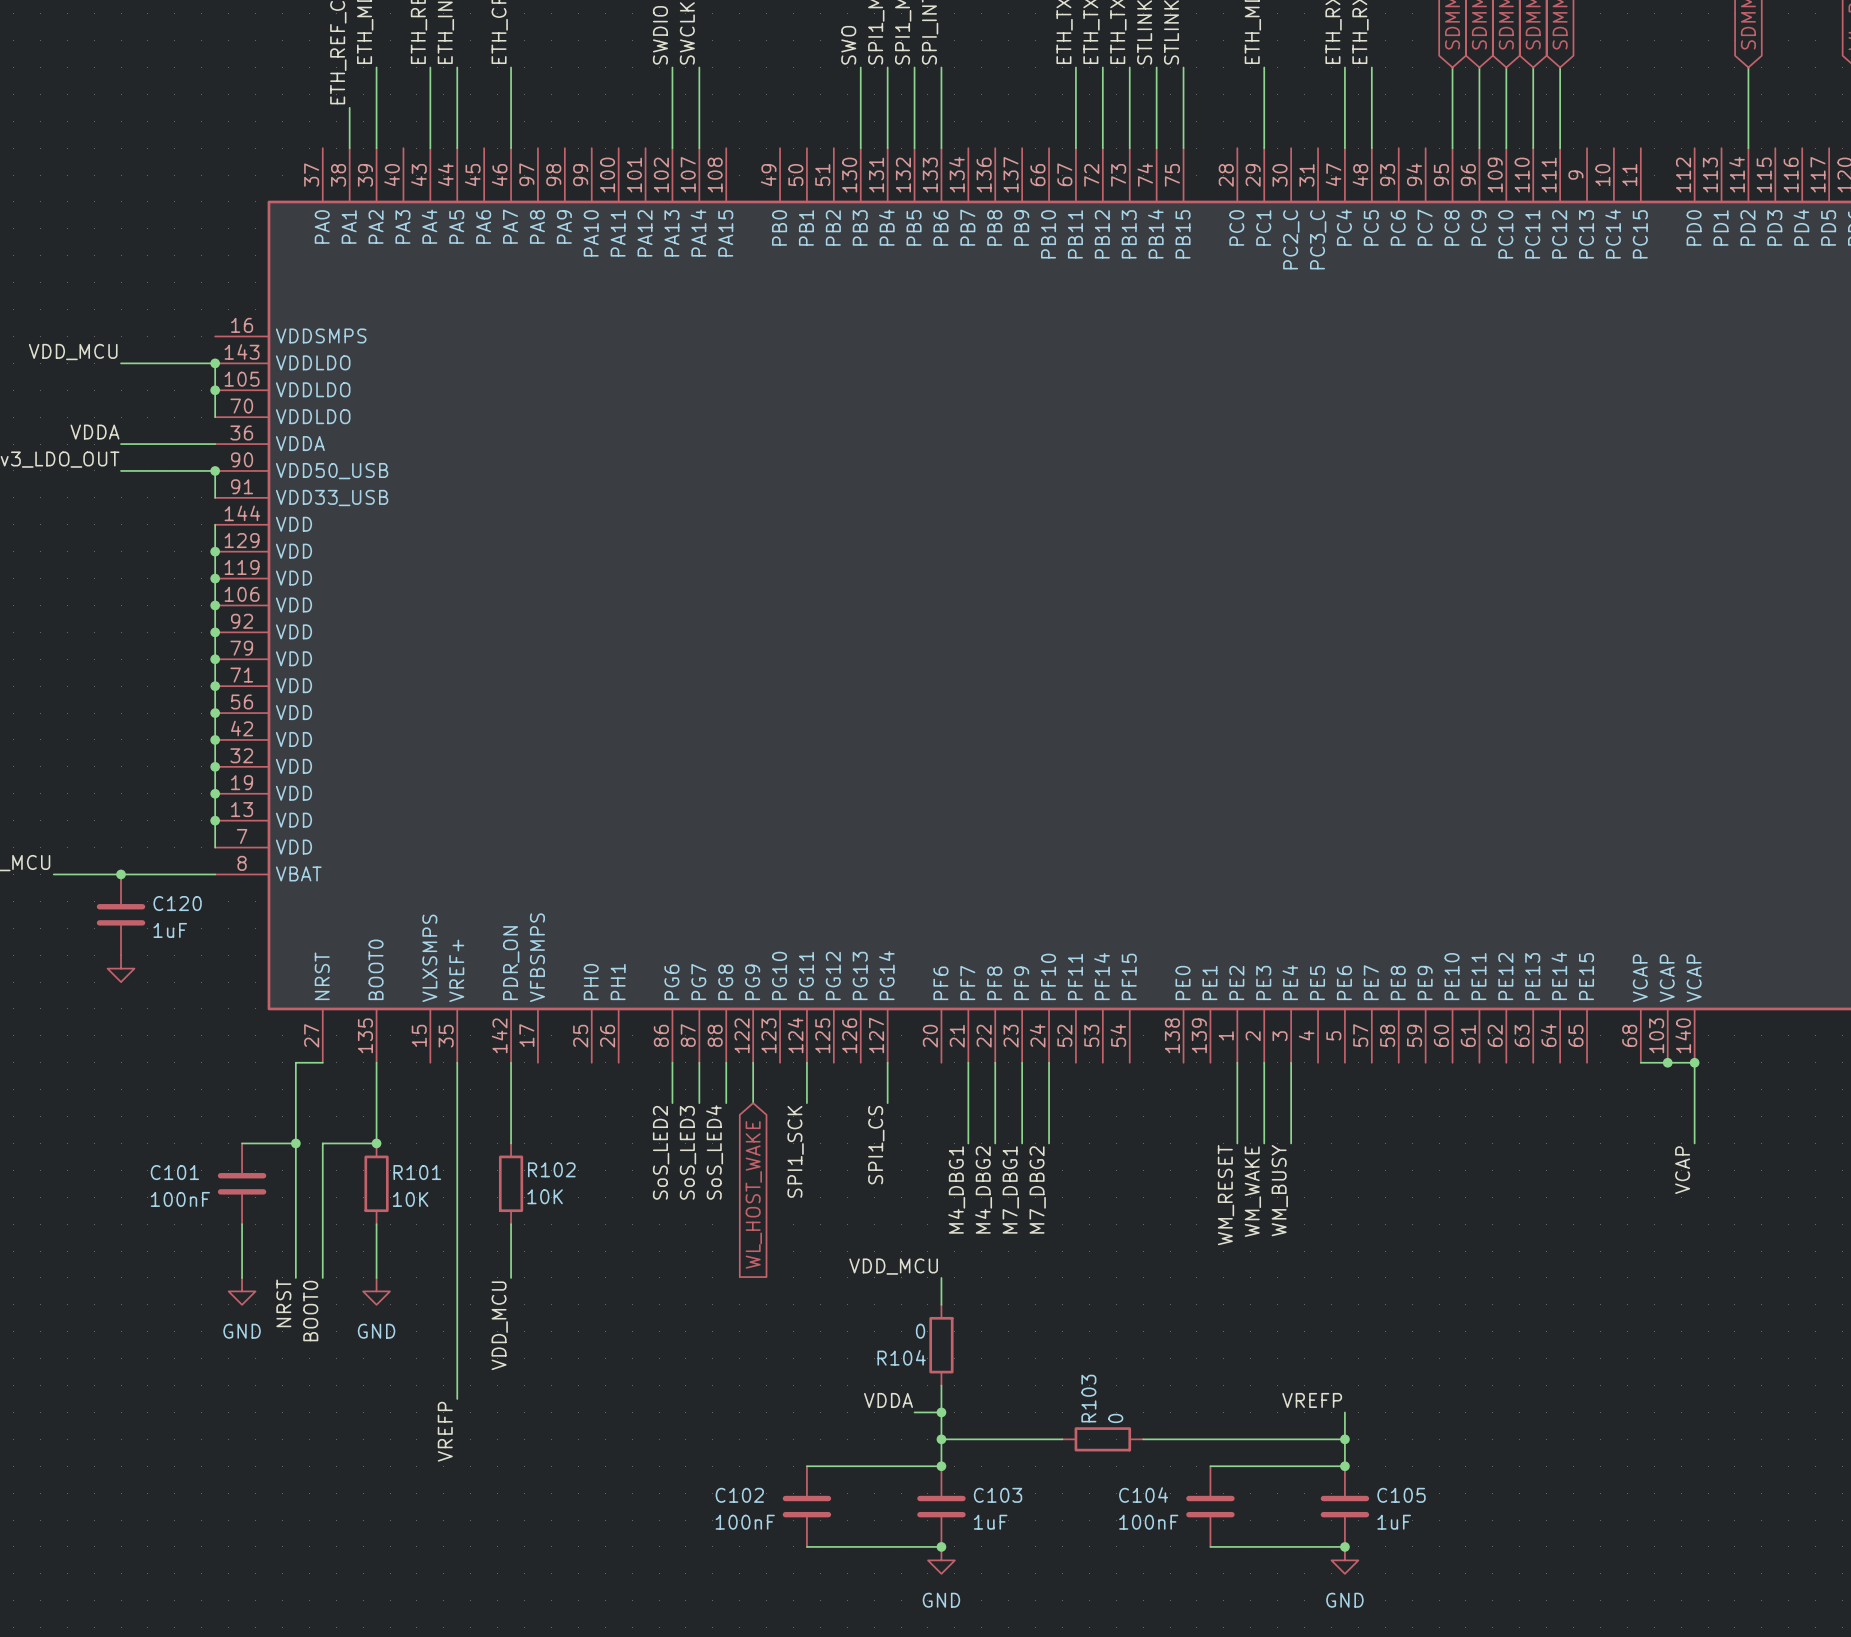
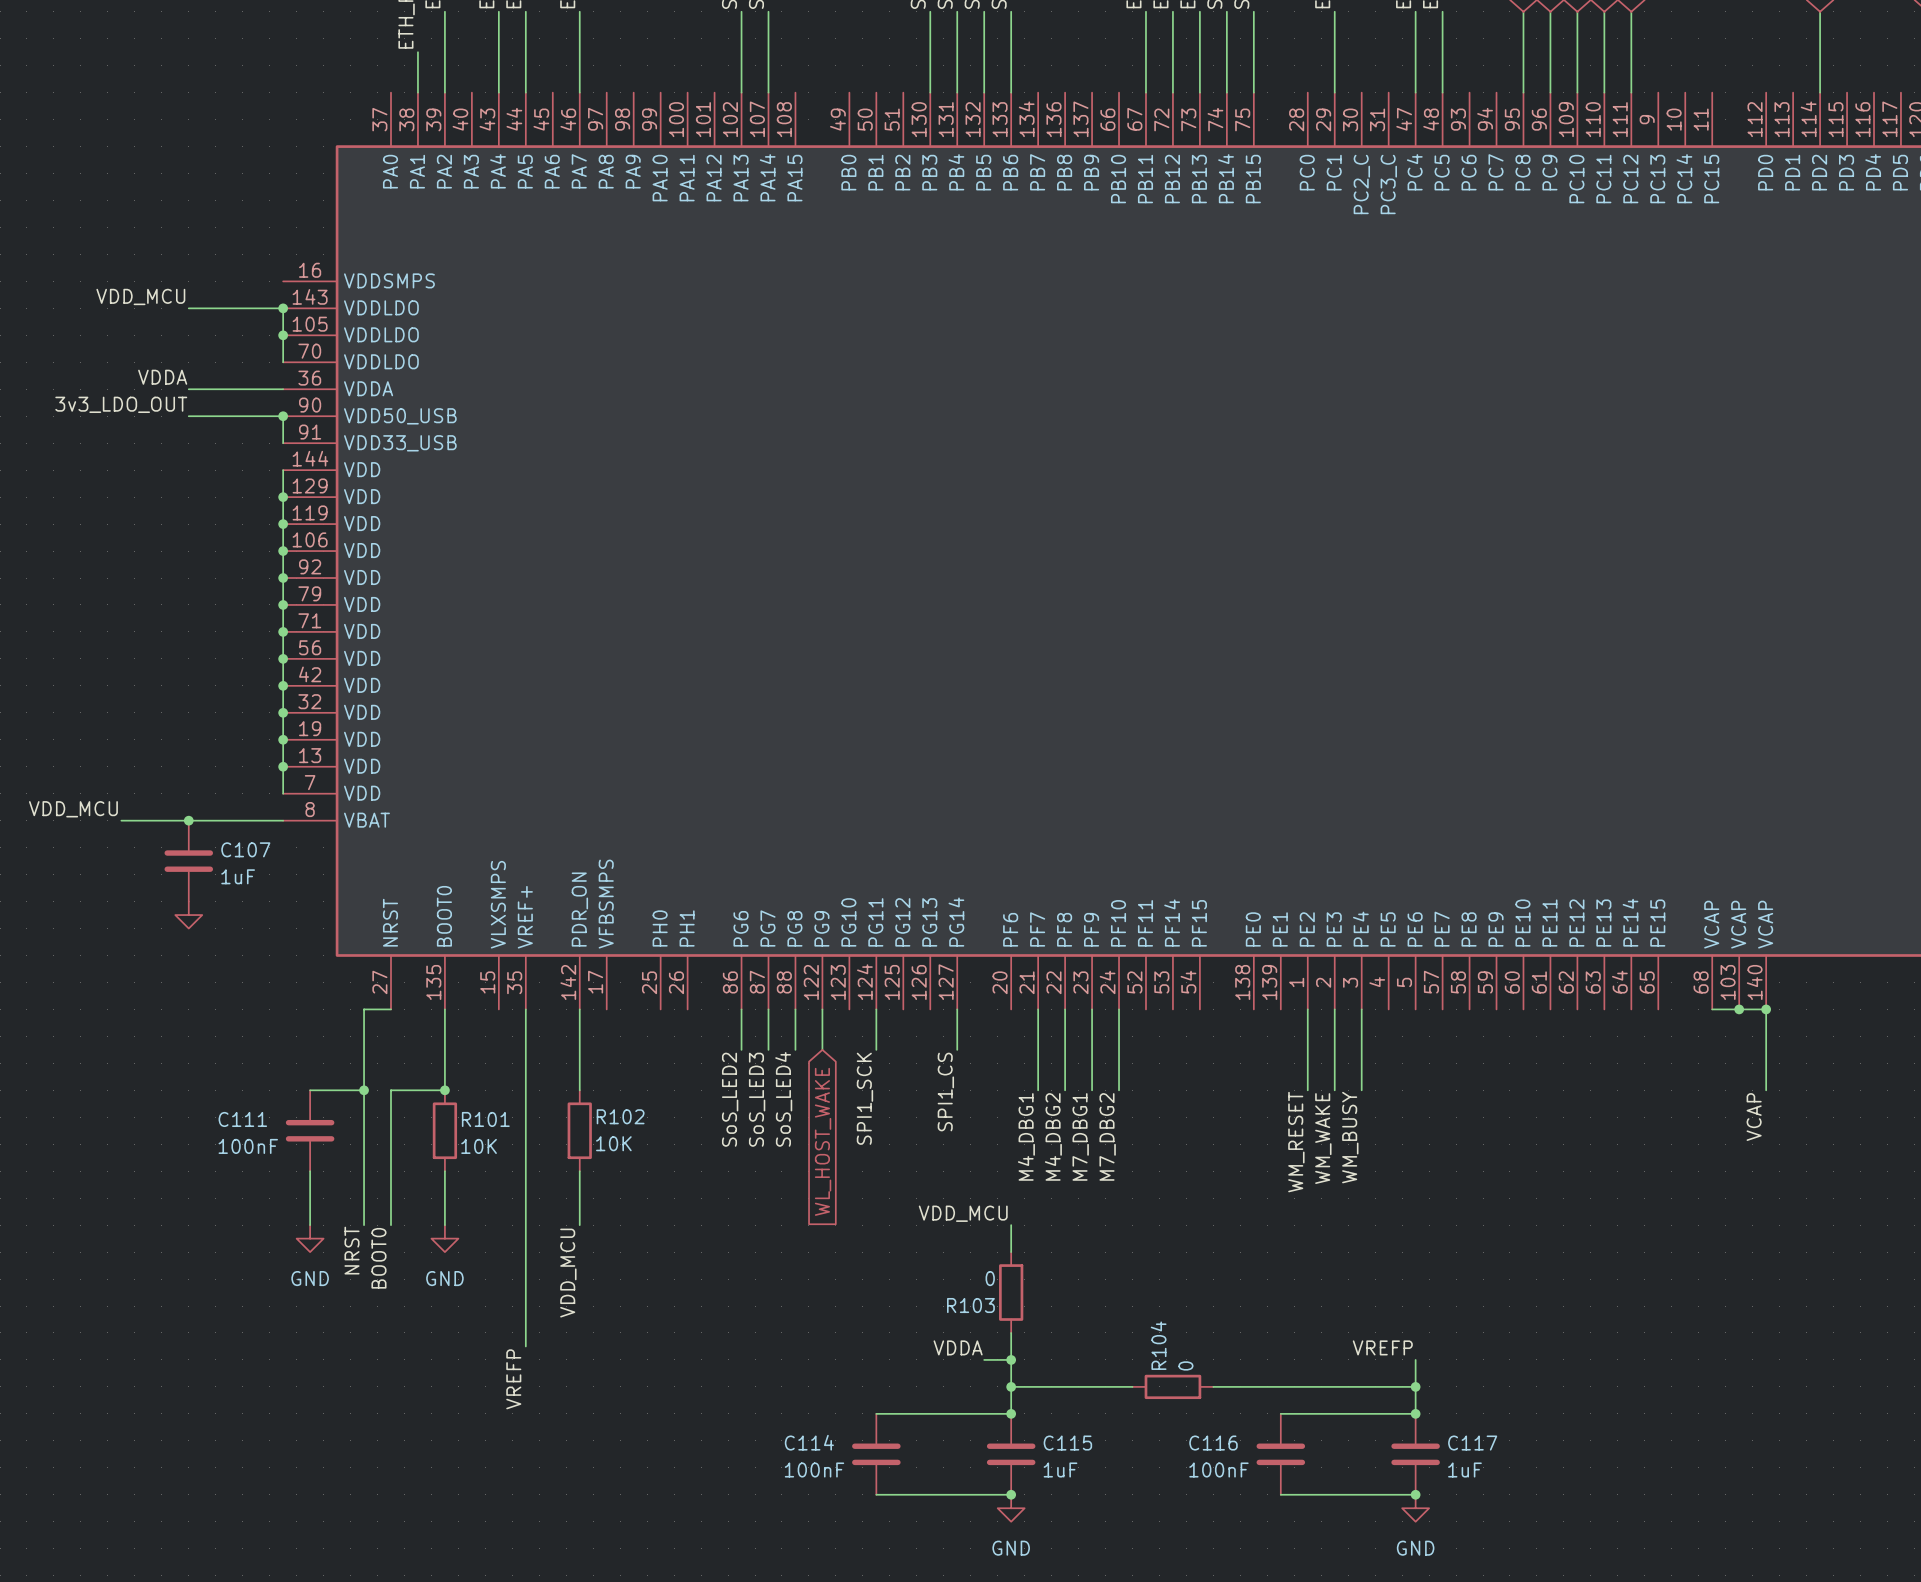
C120 name: C120 (177, 903) -> C107 (245, 849)
C101 name: C101 (174, 1172) -> C111 (242, 1119)
R104 name: R104 (901, 1357) -> R103 (970, 1305)
R103 name: R103 (1088, 1398) -> R104 (1158, 1345)
C102 name: C102 (739, 1495) -> C114 (809, 1442)
C103 name: C103 (998, 1495) -> C115 (1067, 1443)
C104 name: C104 (1143, 1495) -> C116 (1213, 1443)
C105 name: C105 (1401, 1495) -> C117 (1472, 1443)

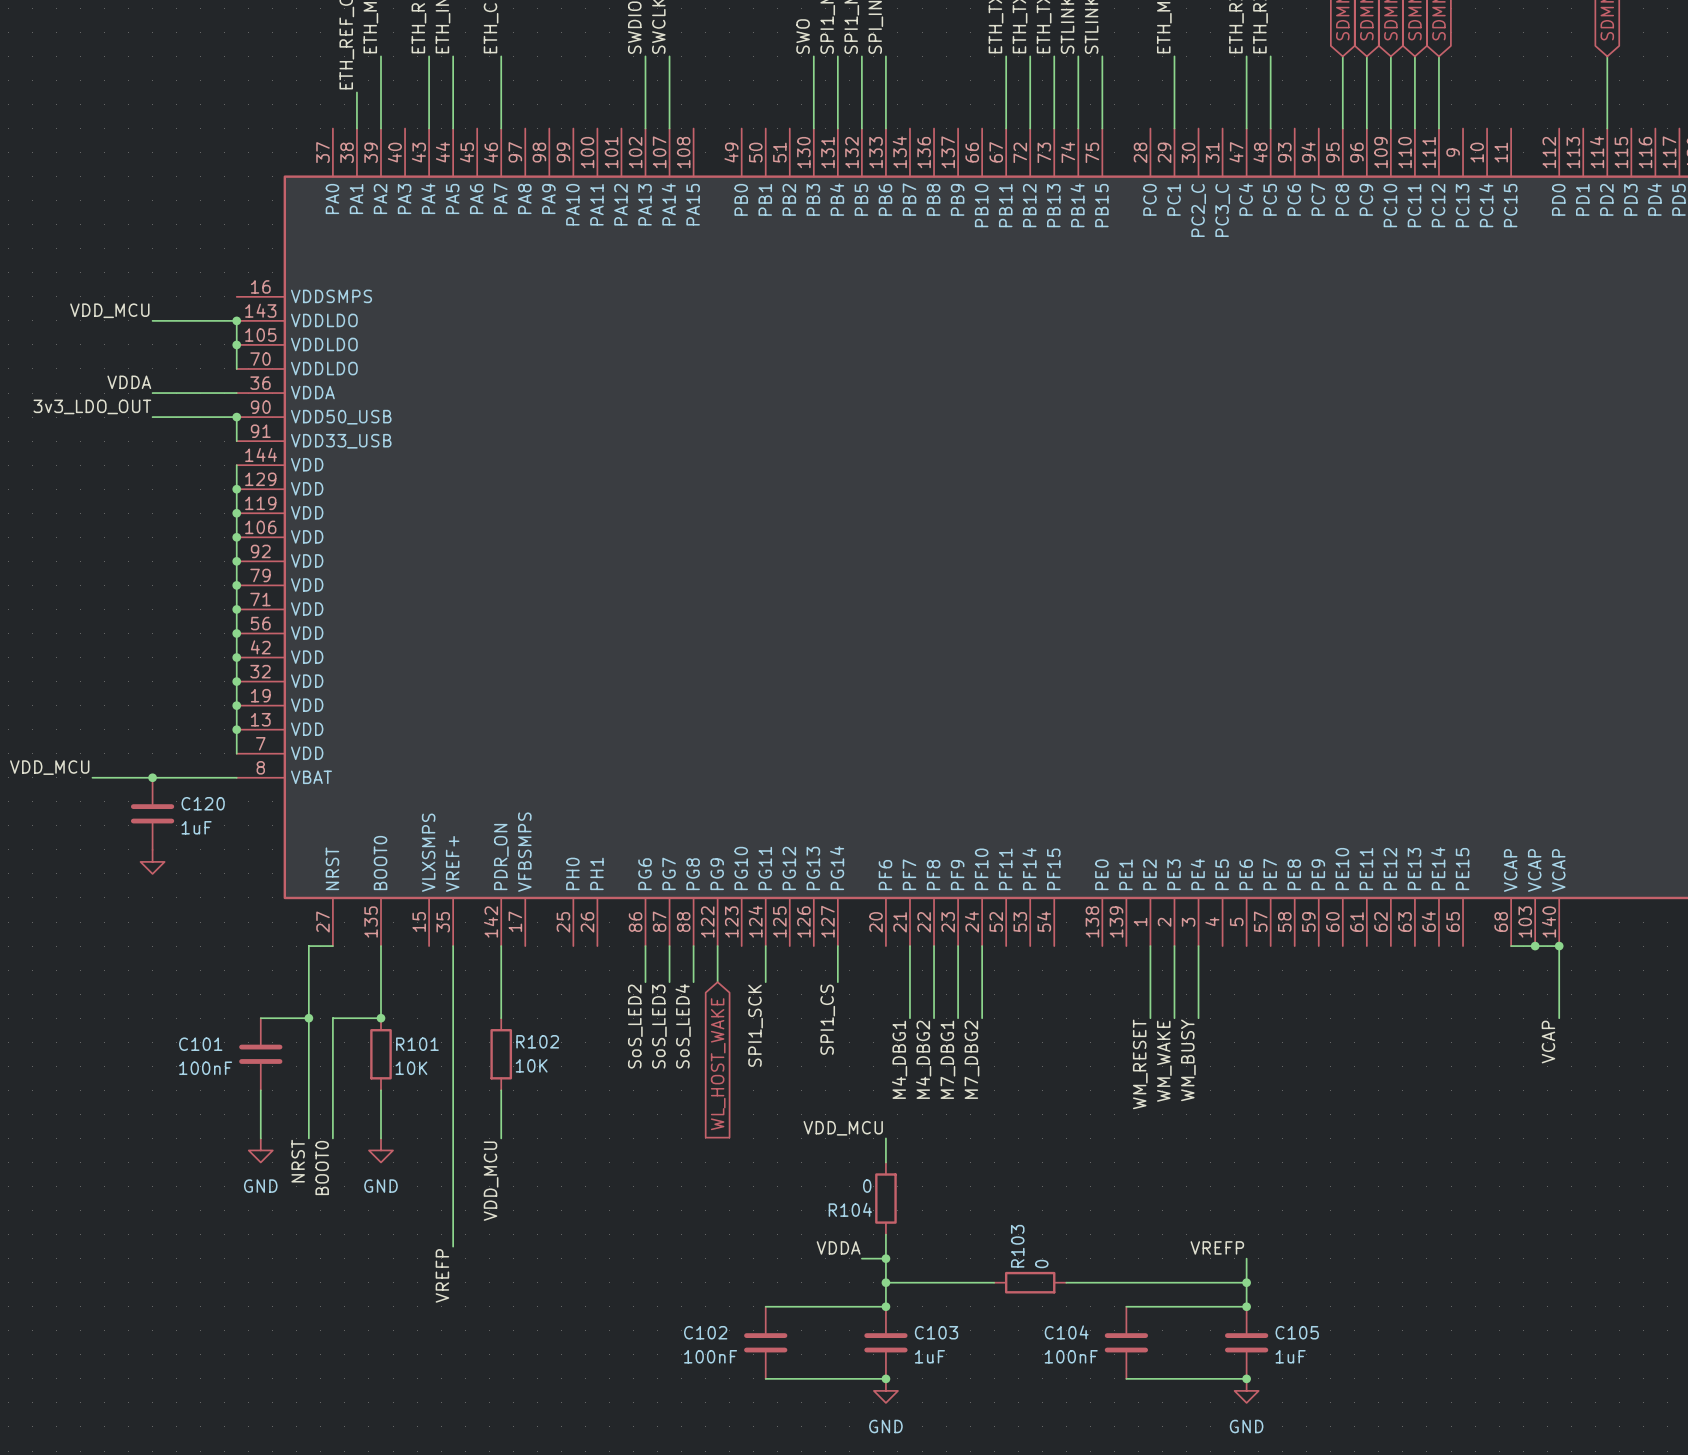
C107 name: C107 (245, 849) -> C120 (203, 803)
C111 name: C111 (242, 1119) -> C101 (200, 1044)
R103 name: R103 (970, 1305) -> R104 (850, 1209)
R104 name: R104 (1158, 1345) -> R103 (1017, 1246)
C114 name: C114 (809, 1442) -> C102 (705, 1332)
C115 name: C115 (1067, 1443) -> C103 (936, 1332)
C116 name: C116 (1213, 1443) -> C104 (1066, 1332)
C117 name: C117 (1472, 1443) -> C105 (1297, 1332)

